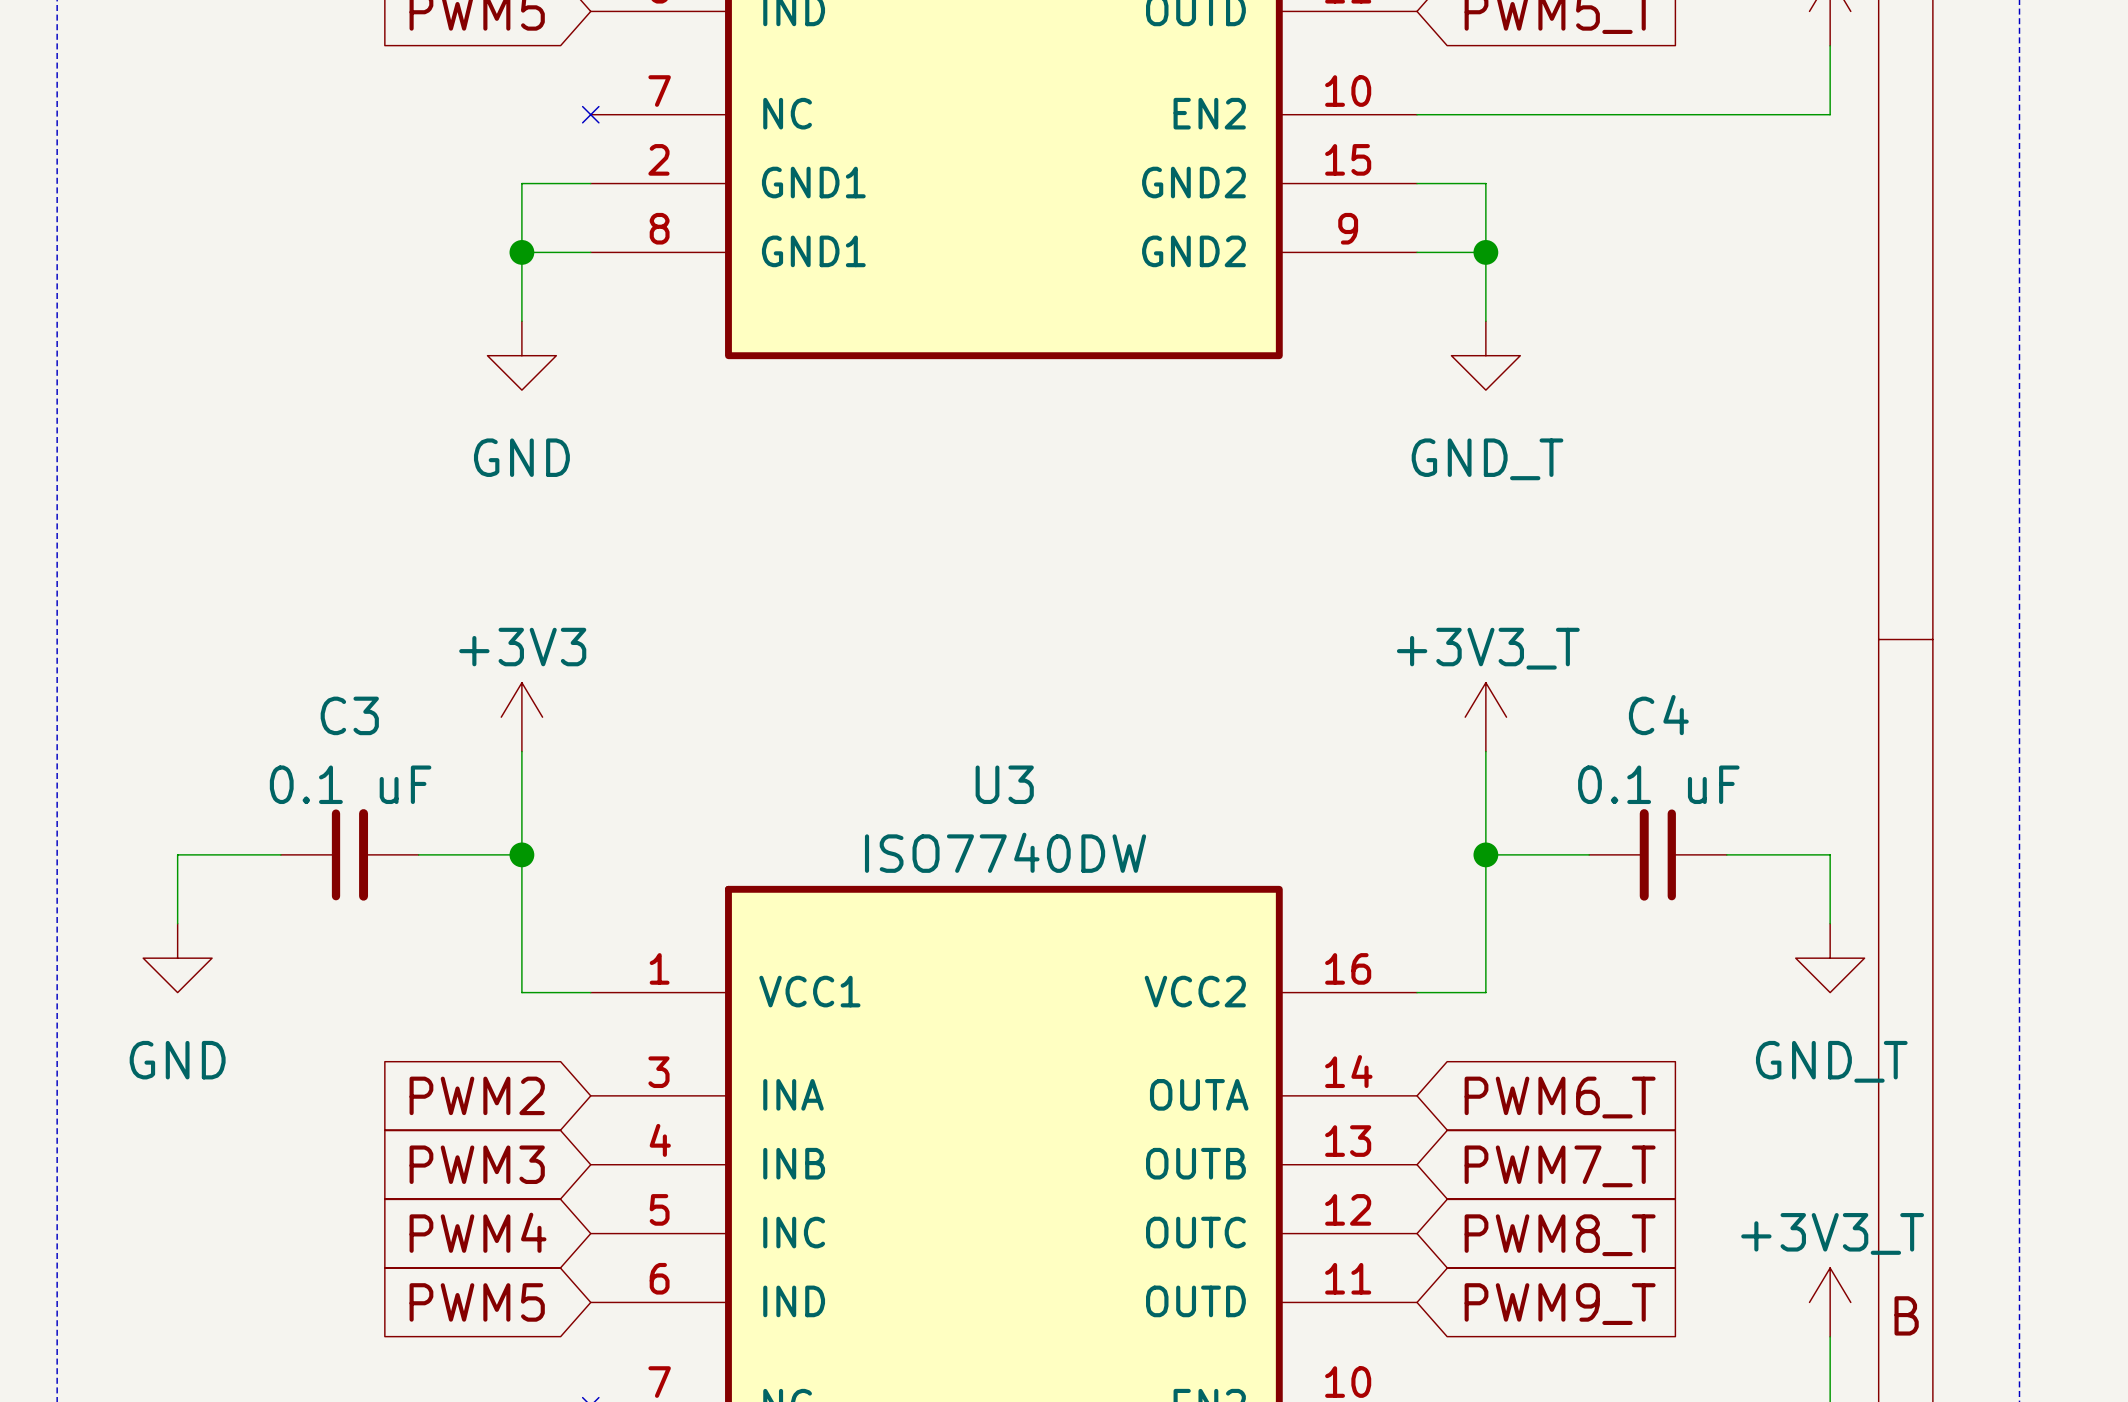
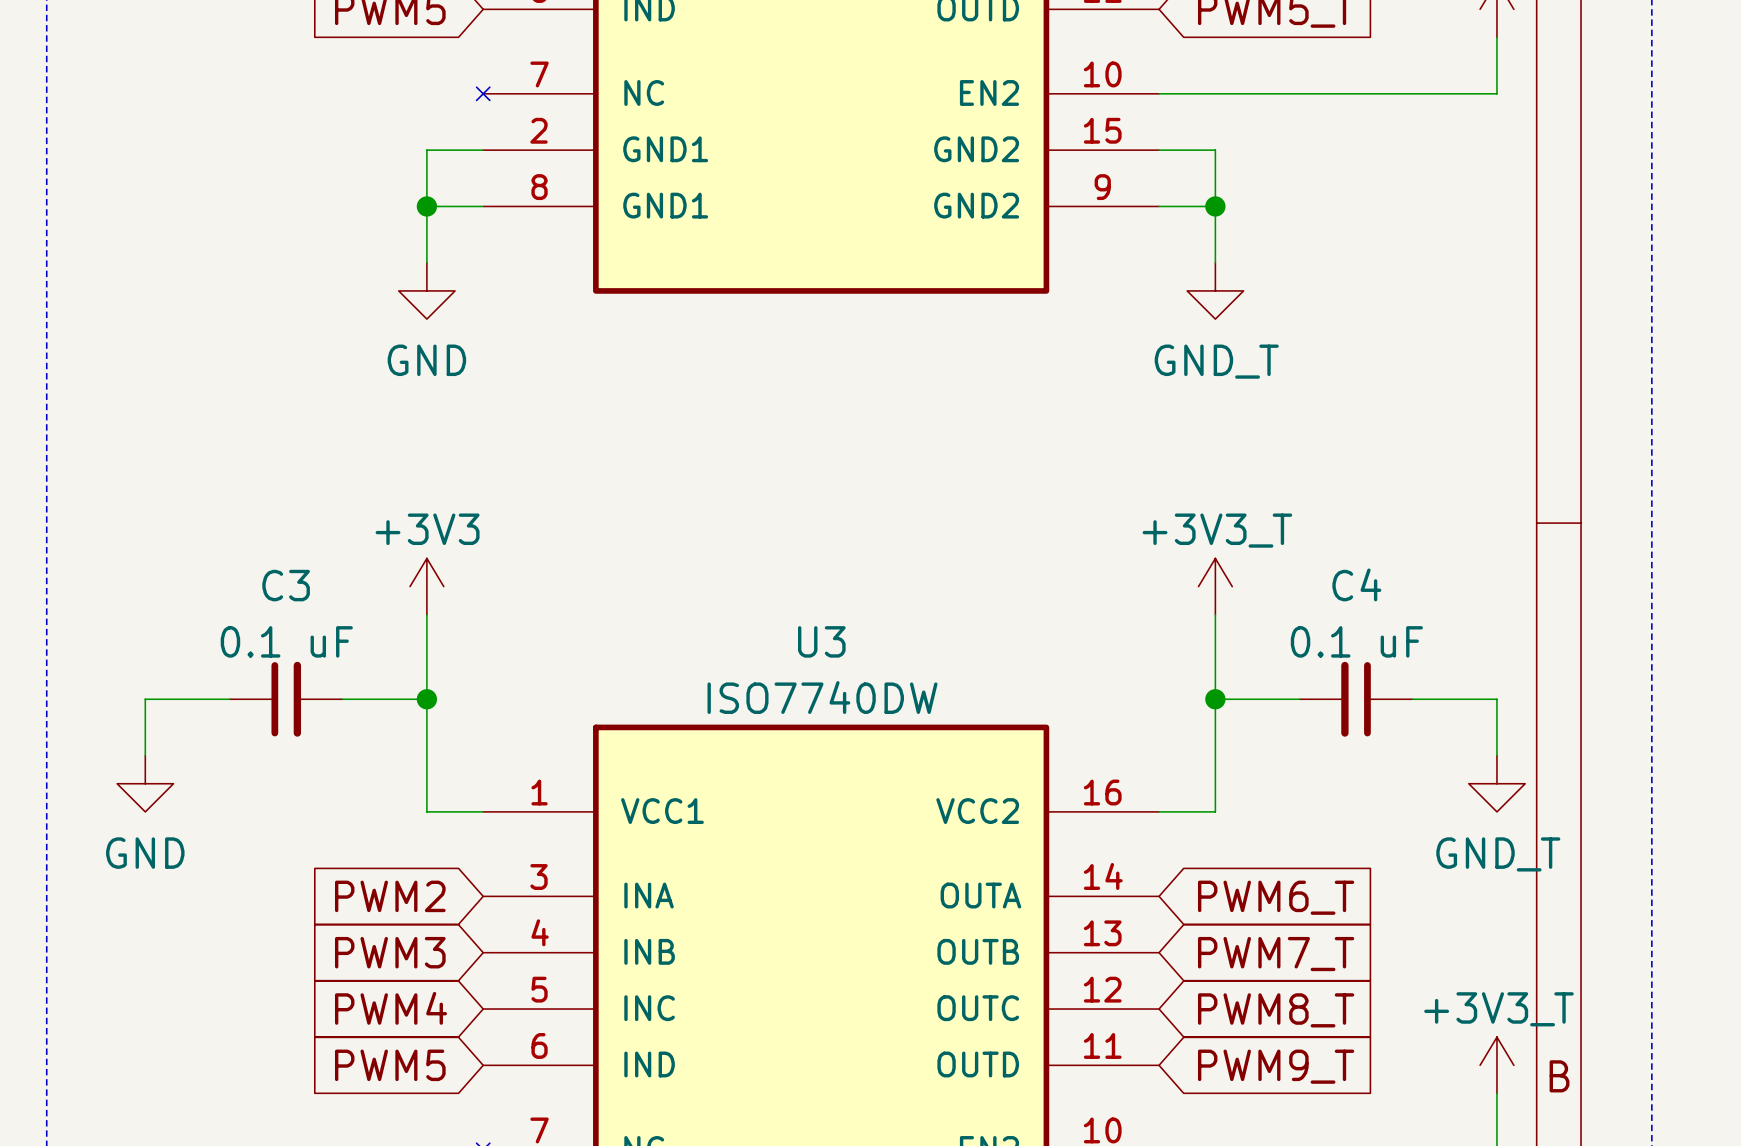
power symbol text position: GND (521, 457) -> GND (426, 360)
power symbol text position: GND_T (1487, 459) -> GND_T (1216, 361)
power symbol text position: GND (177, 1060) -> GND (145, 853)
power symbol text position: GND_T (1831, 1061) -> GND_T (1498, 854)

